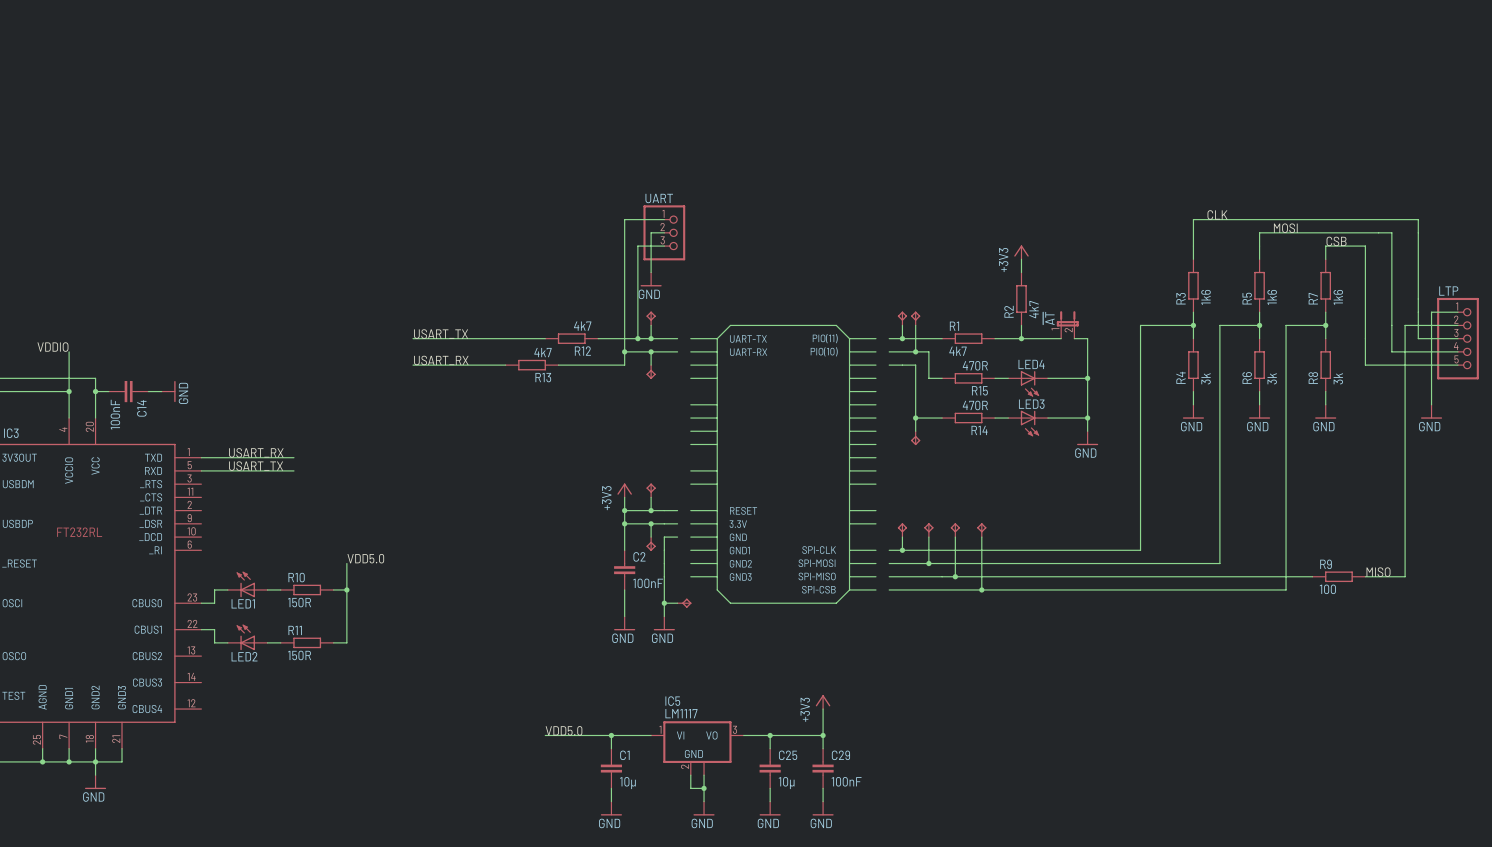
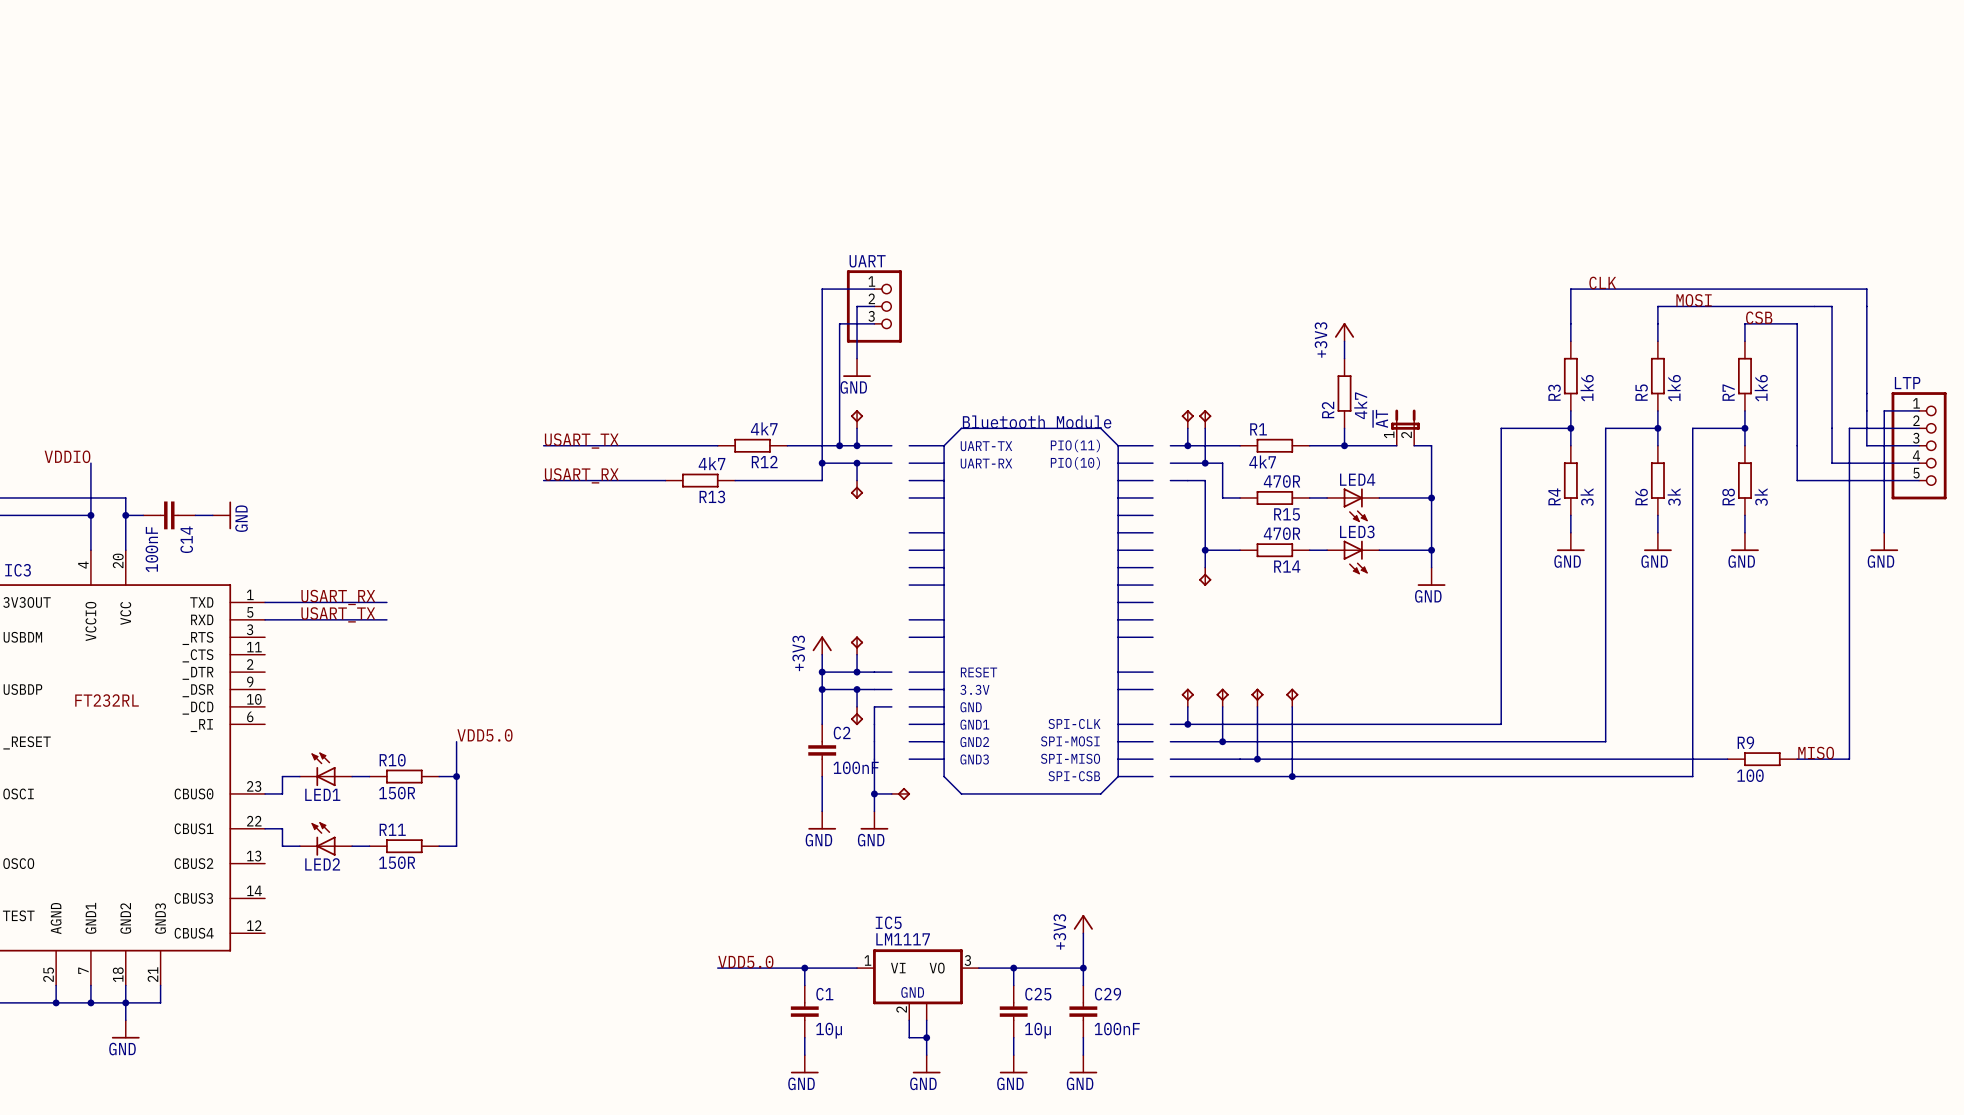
text: none -> Bluetooth Module (1037, 421)

